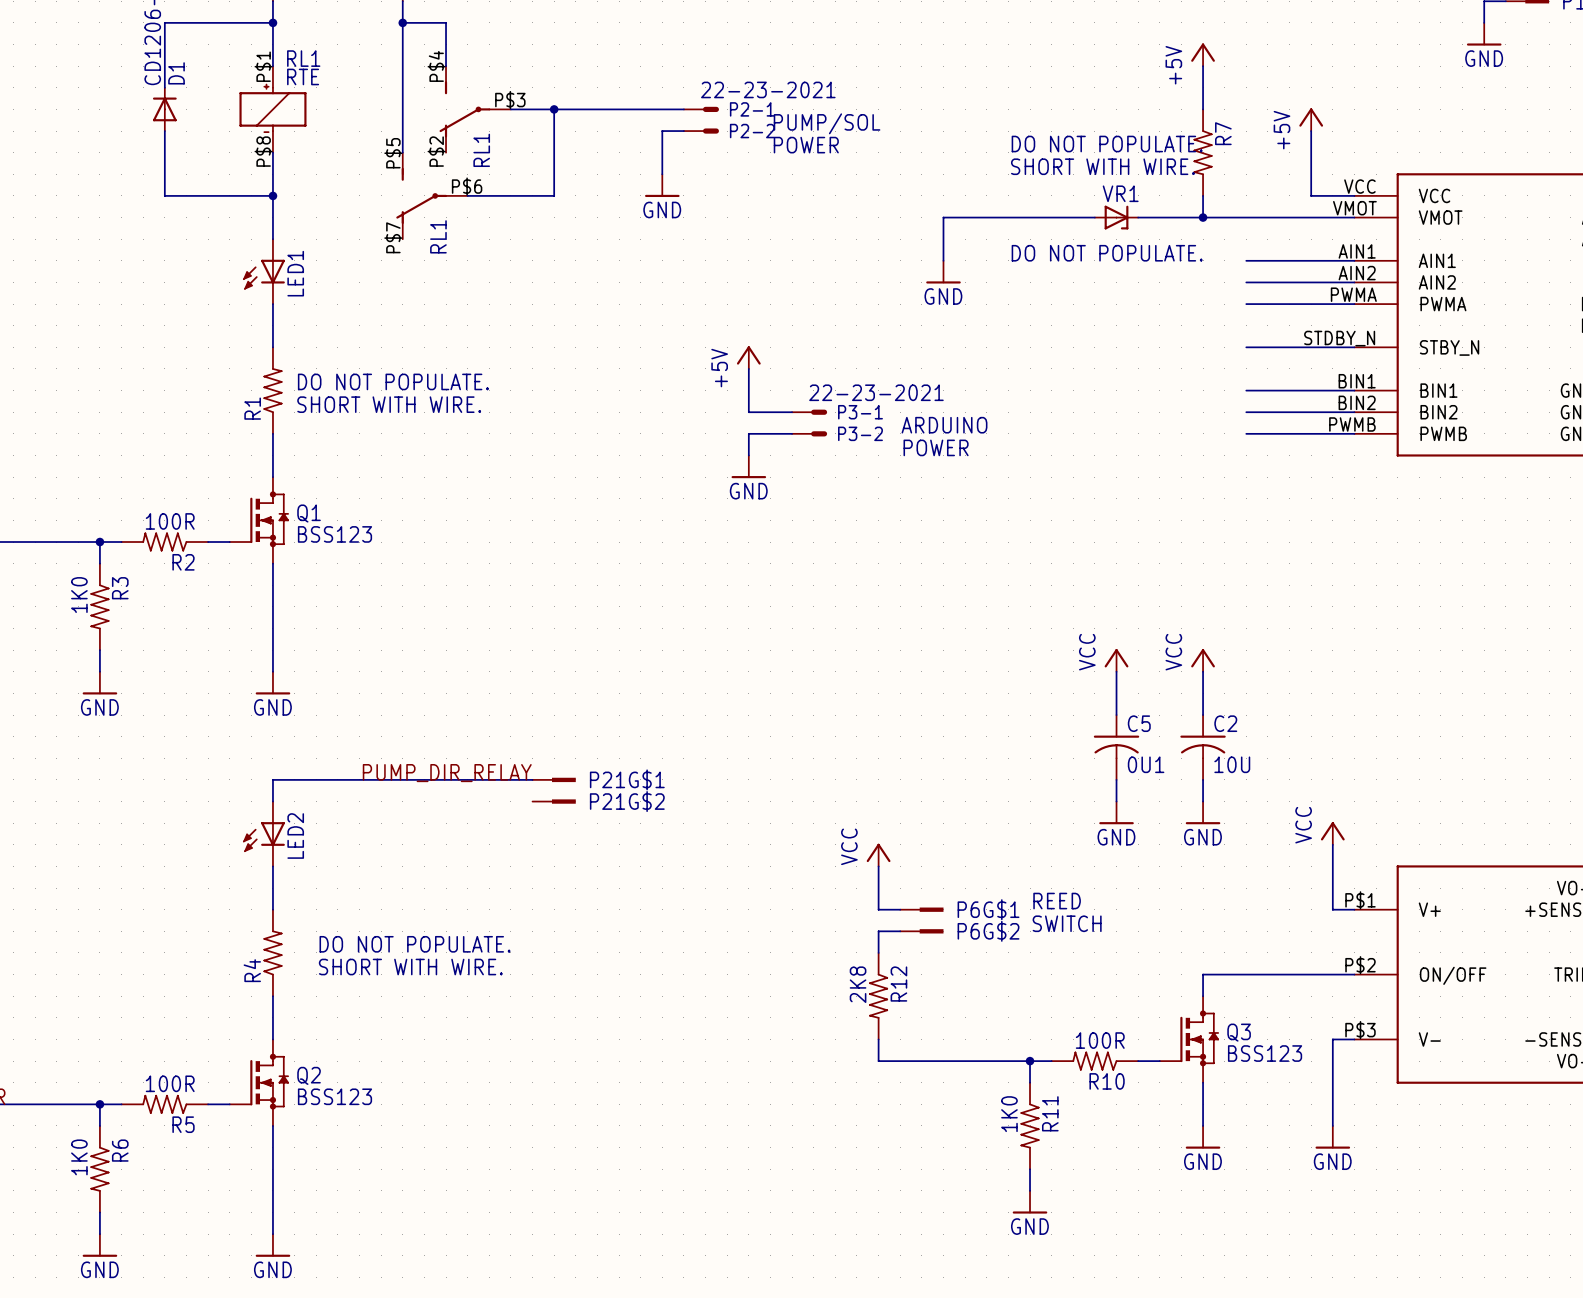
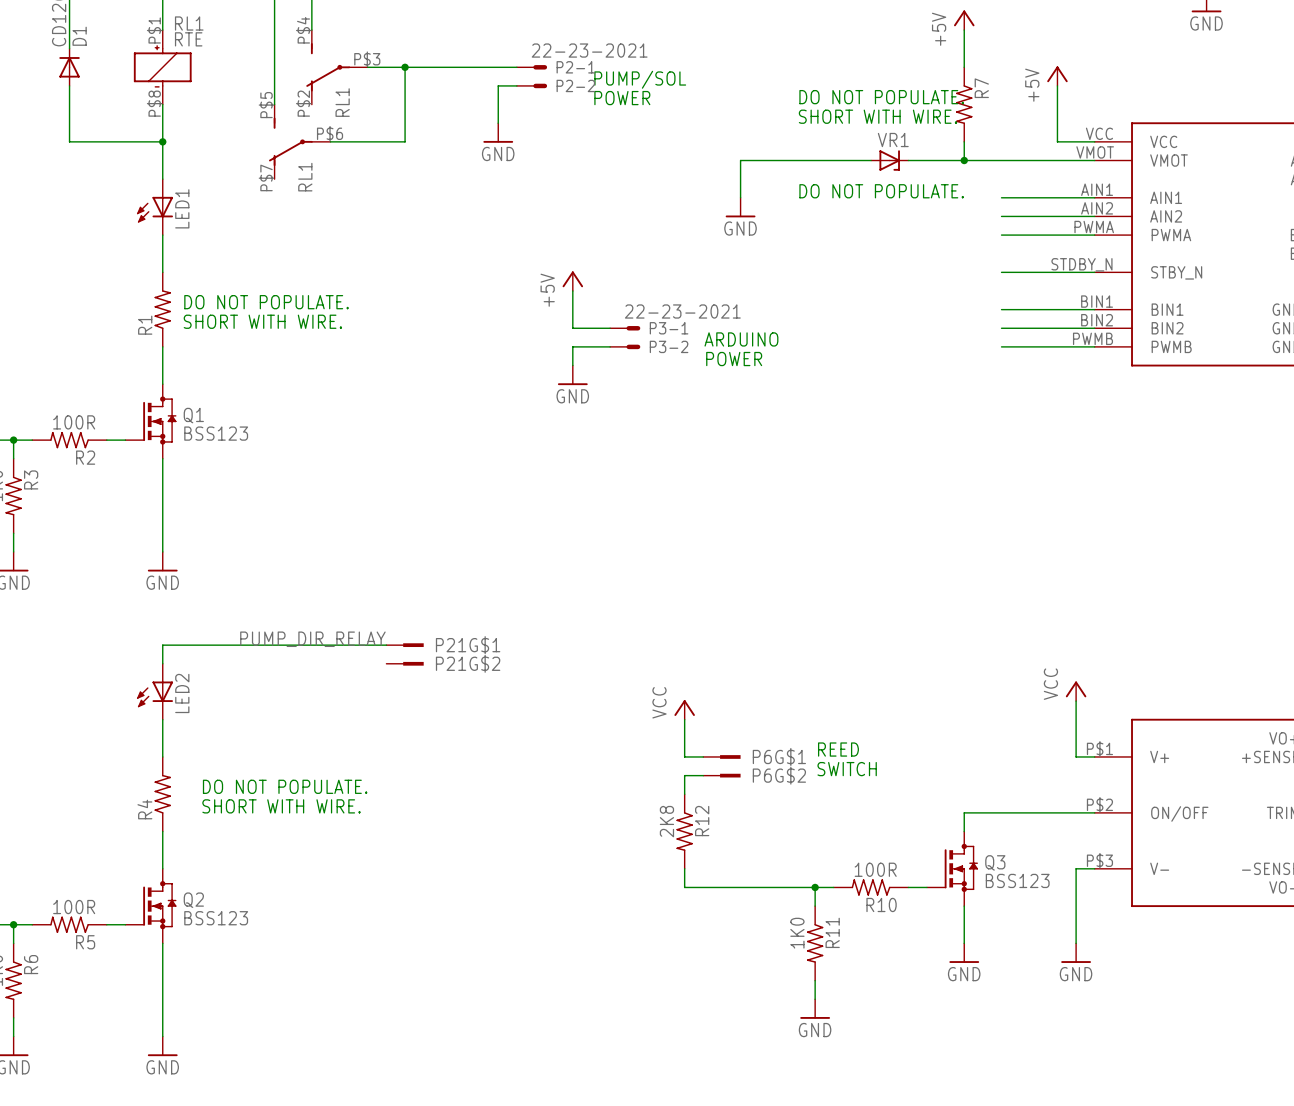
power symbol: VCC (1116, 660) -> none
power symbol: VCC (1203, 660) -> none
wire: (1116, 671) (1116, 715) -> none
wire: (1203, 671) (1203, 715) -> none
C5: 0U1 (1116, 747) -> none
C2: 10U (1203, 747) -> none
wire: (1116, 779) (1116, 801) -> none
wire: (1203, 779) (1203, 801) -> none
power symbol: GND (1116, 812) -> none
power symbol: GND (1203, 812) -> none

